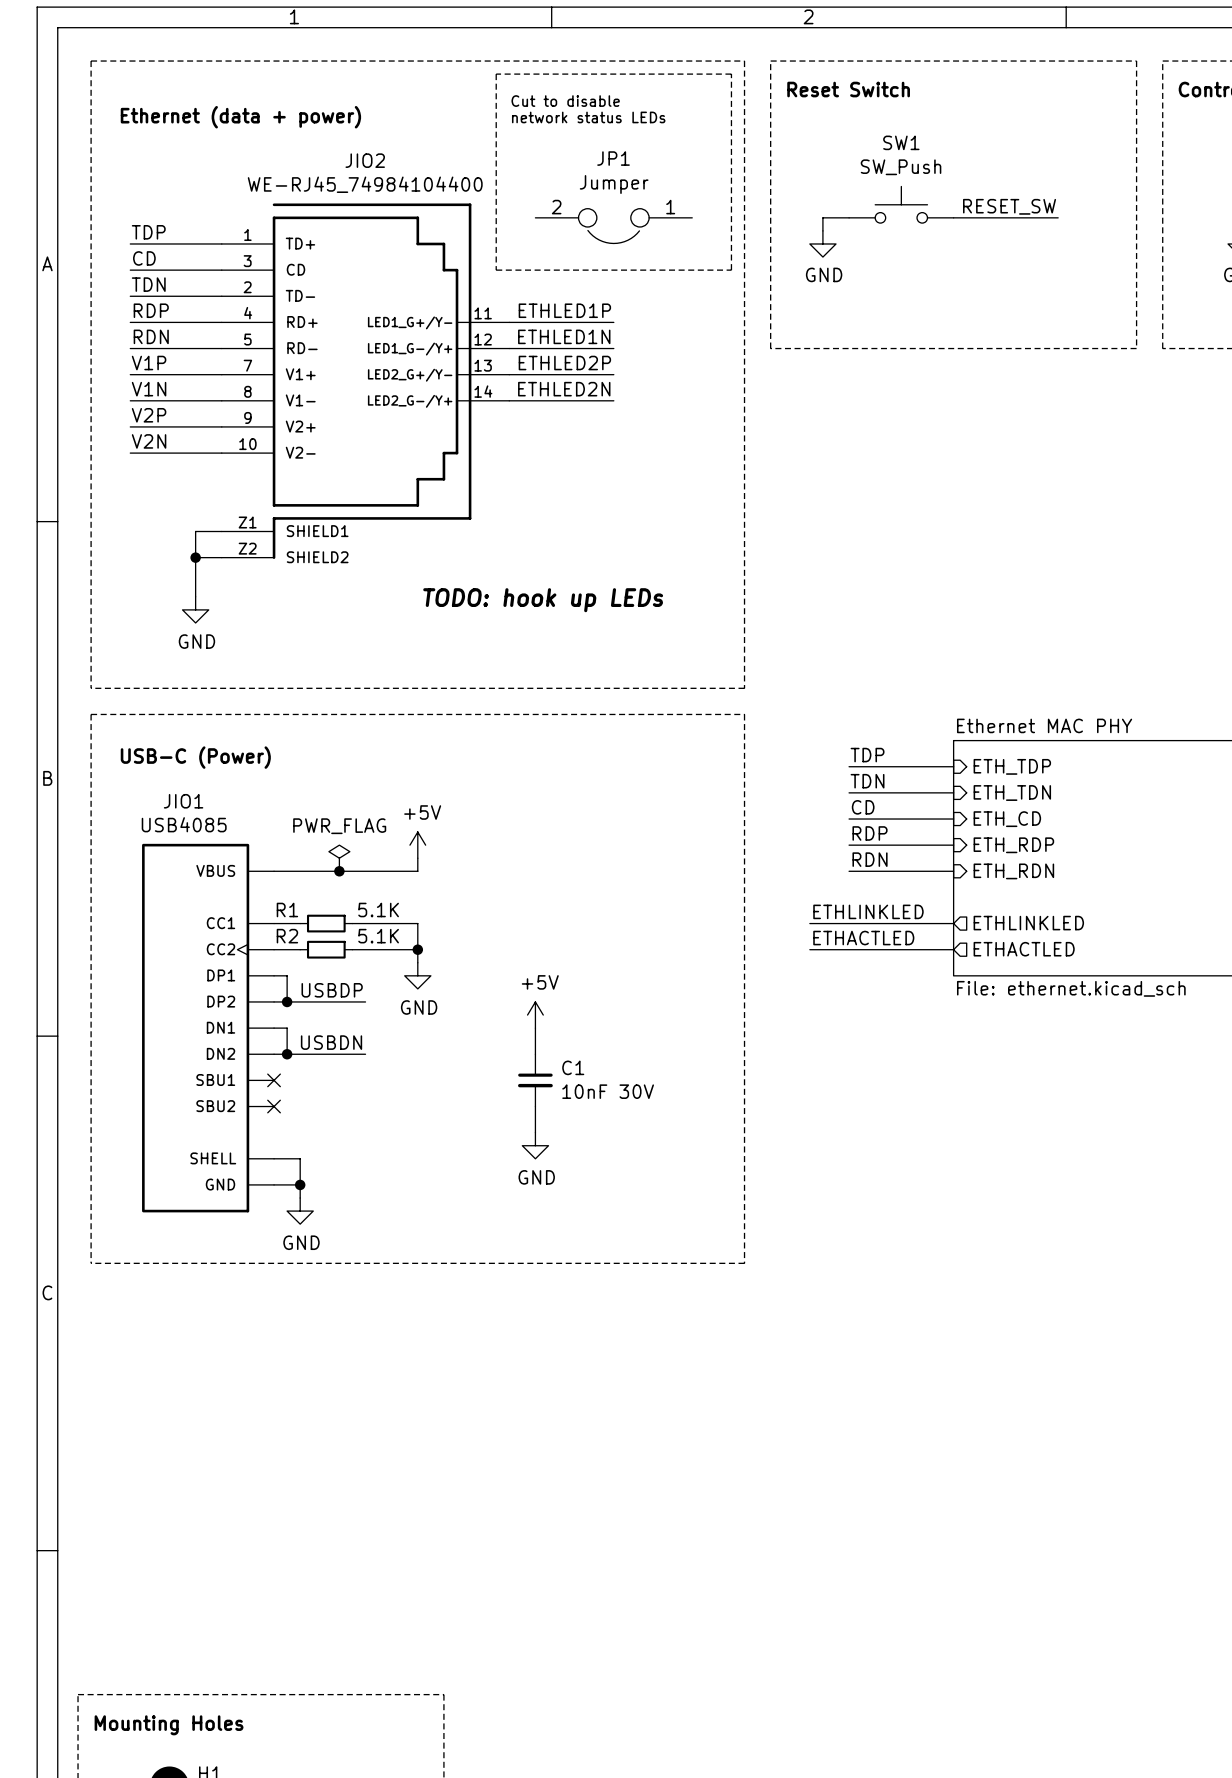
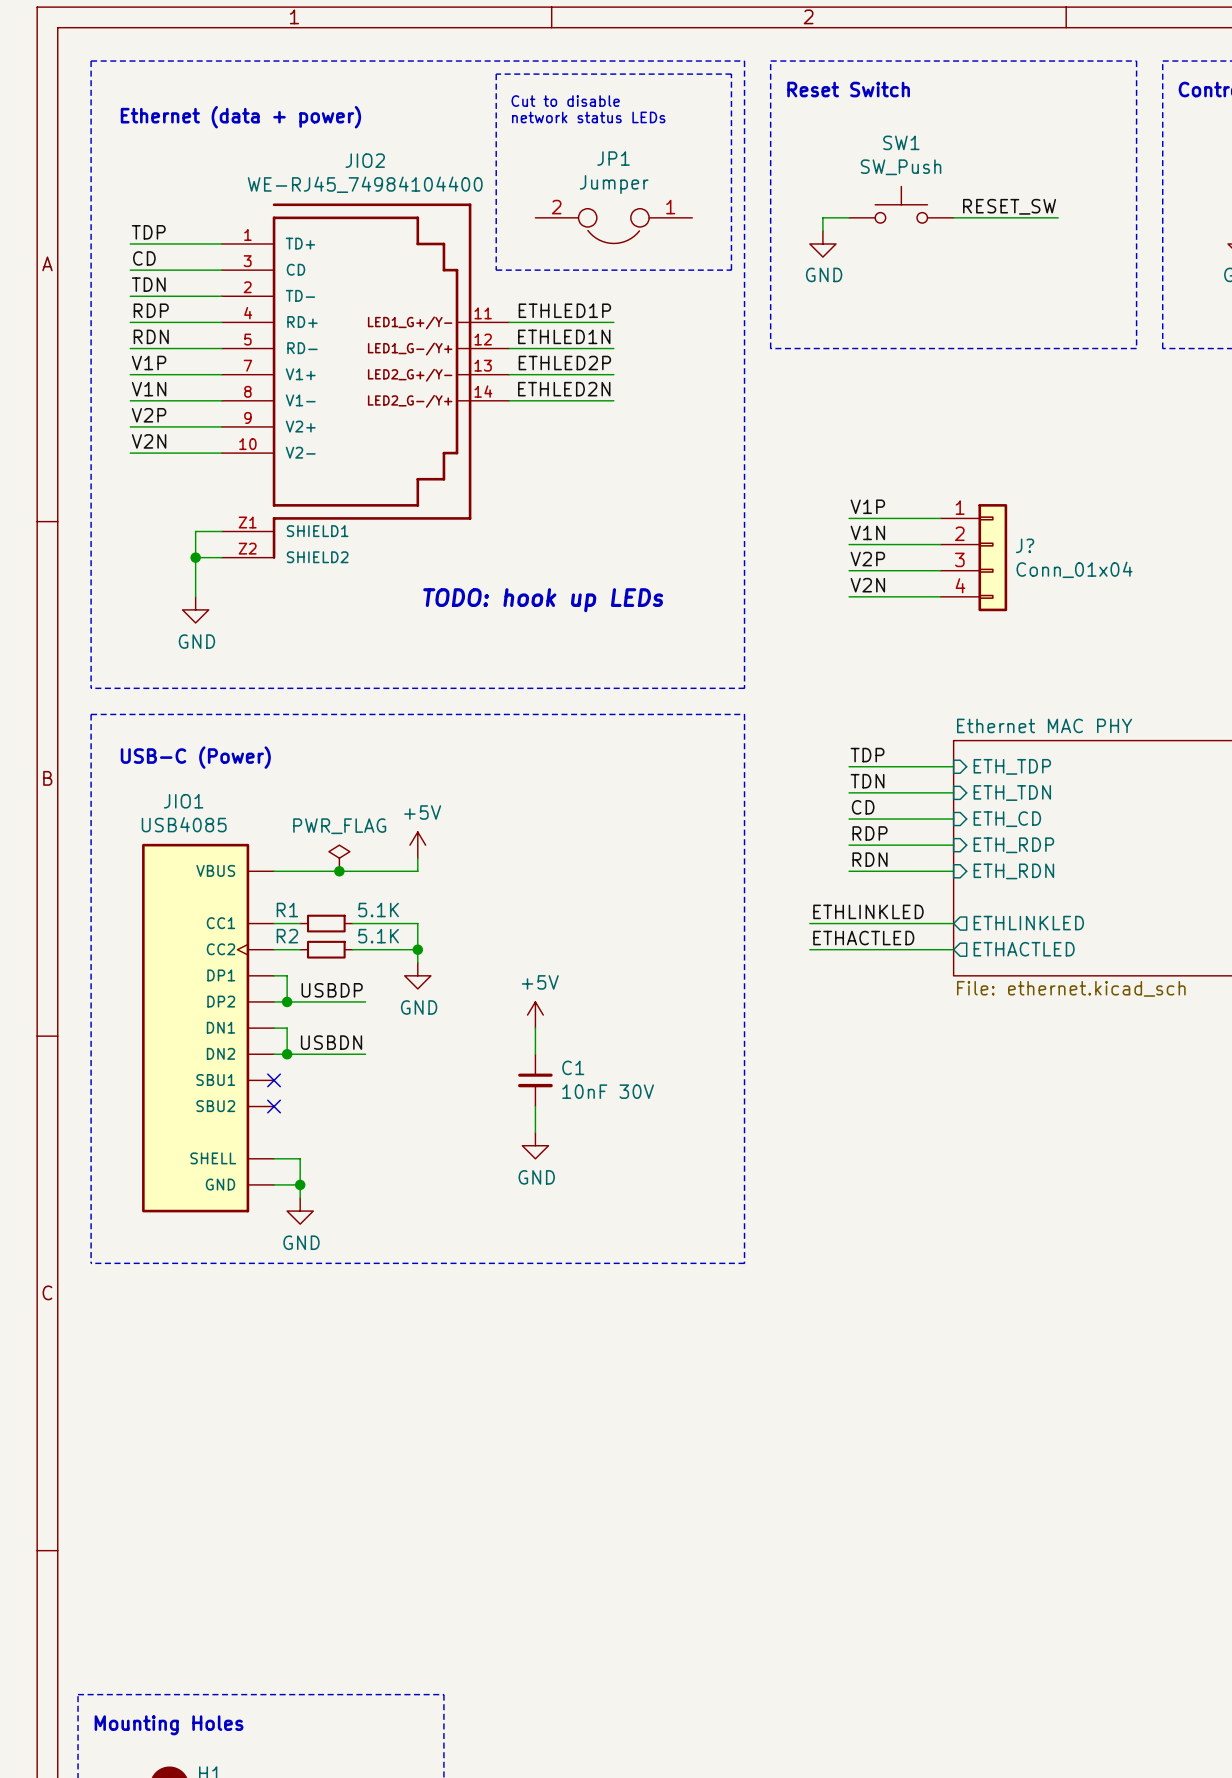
label: none -> V1P (867, 506)
wire: none -> (849, 518) (940, 518)
label: none -> V1N (867, 532)
wire: none -> (849, 544) (940, 544)
J?: none -> Conn_01x04 (973, 557)
label: none -> V2P (867, 559)
wire: none -> (849, 570) (940, 570)
label: none -> V2N (867, 585)
wire: none -> (849, 596) (940, 596)

